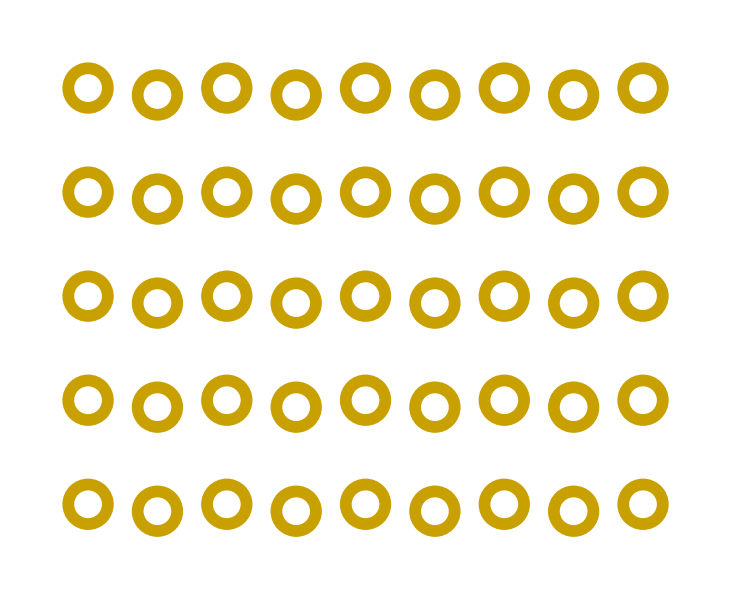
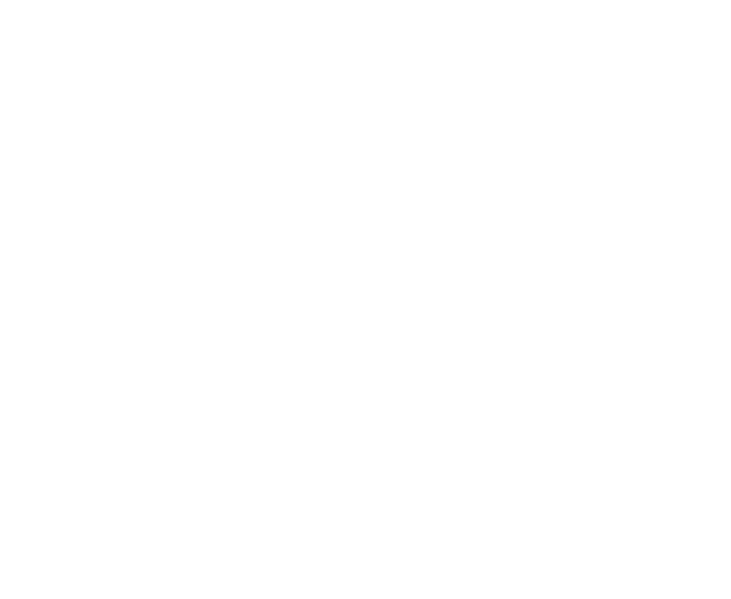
part: (365, 91) -> none
part: (365, 195) -> none
part: (365, 299) -> none
part: (365, 403) -> none
part: (365, 507) -> none

